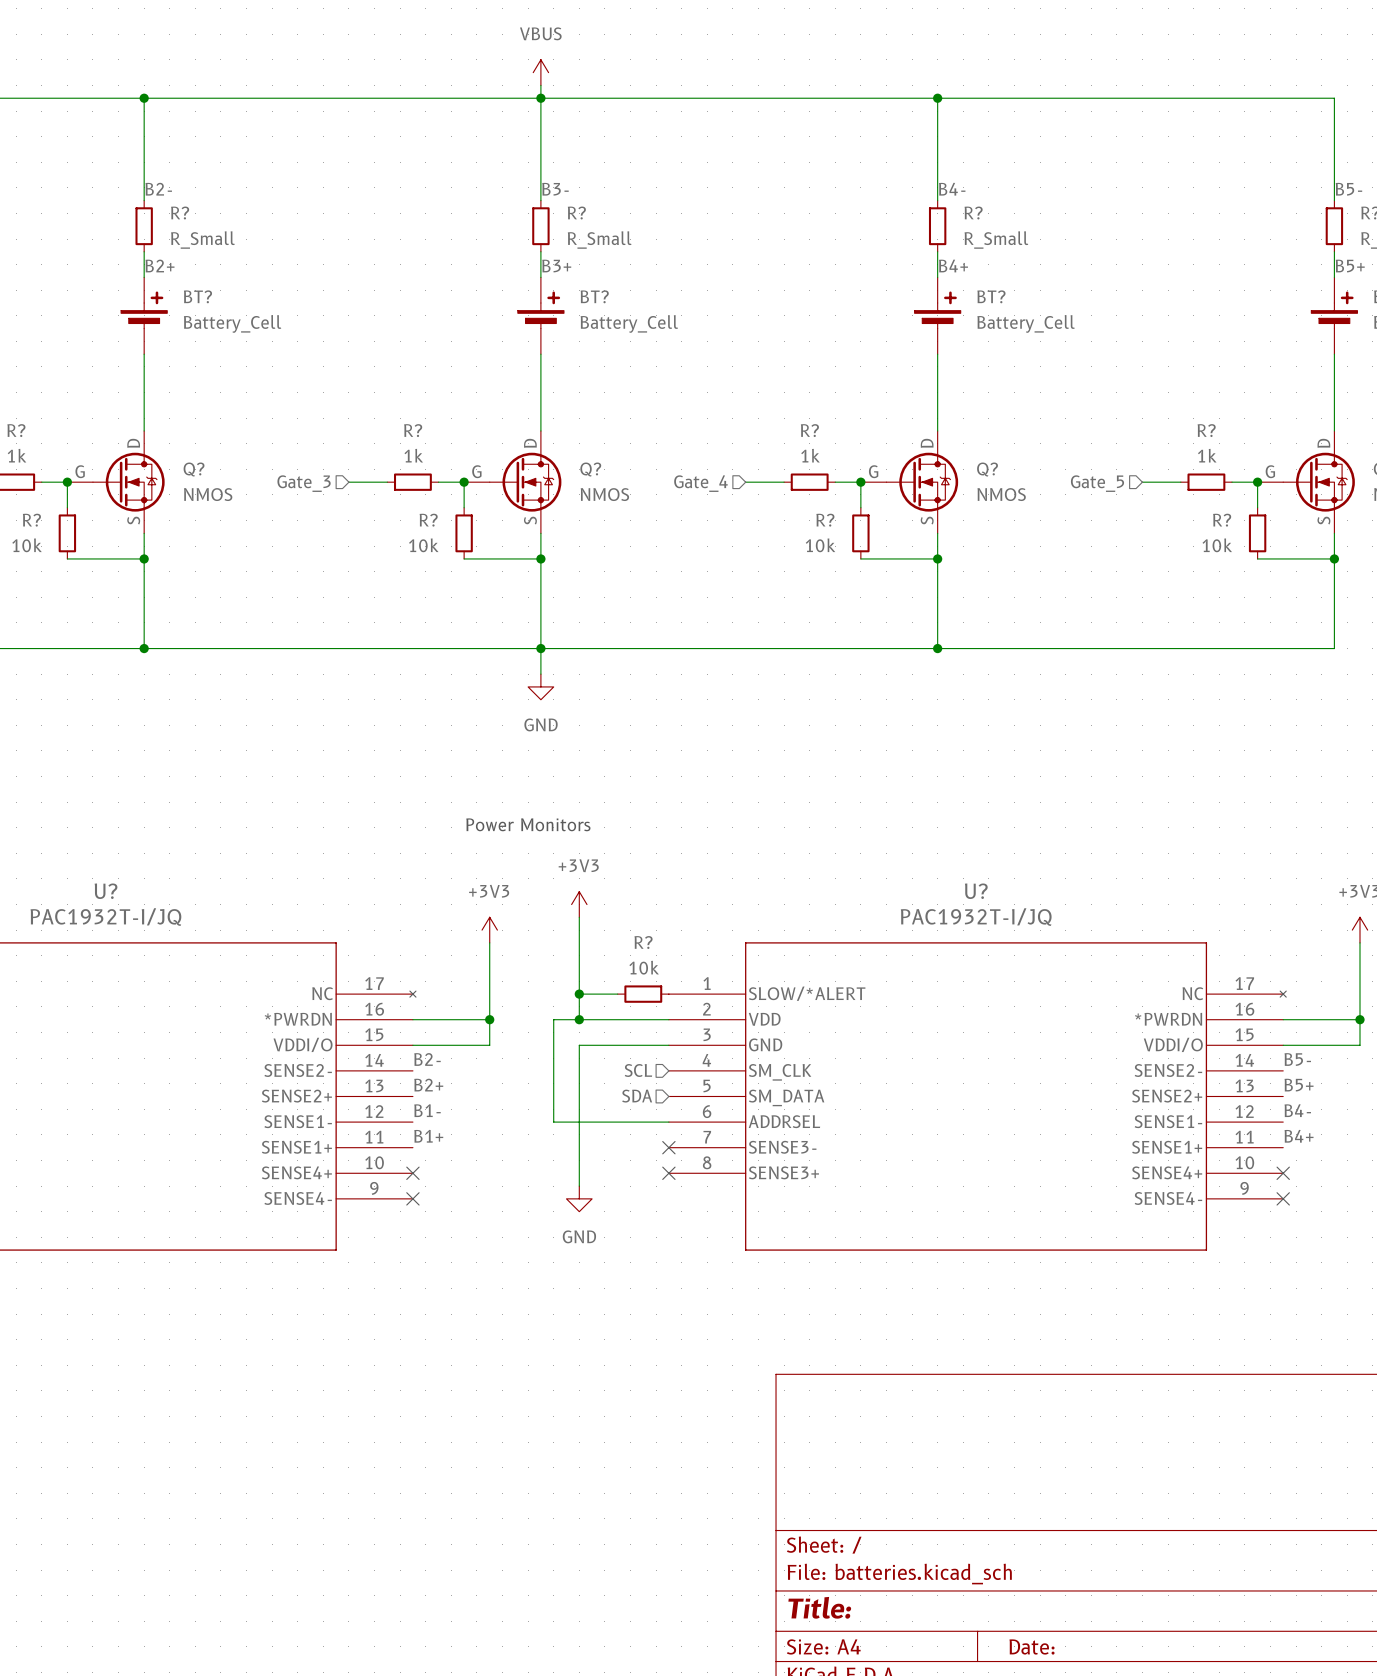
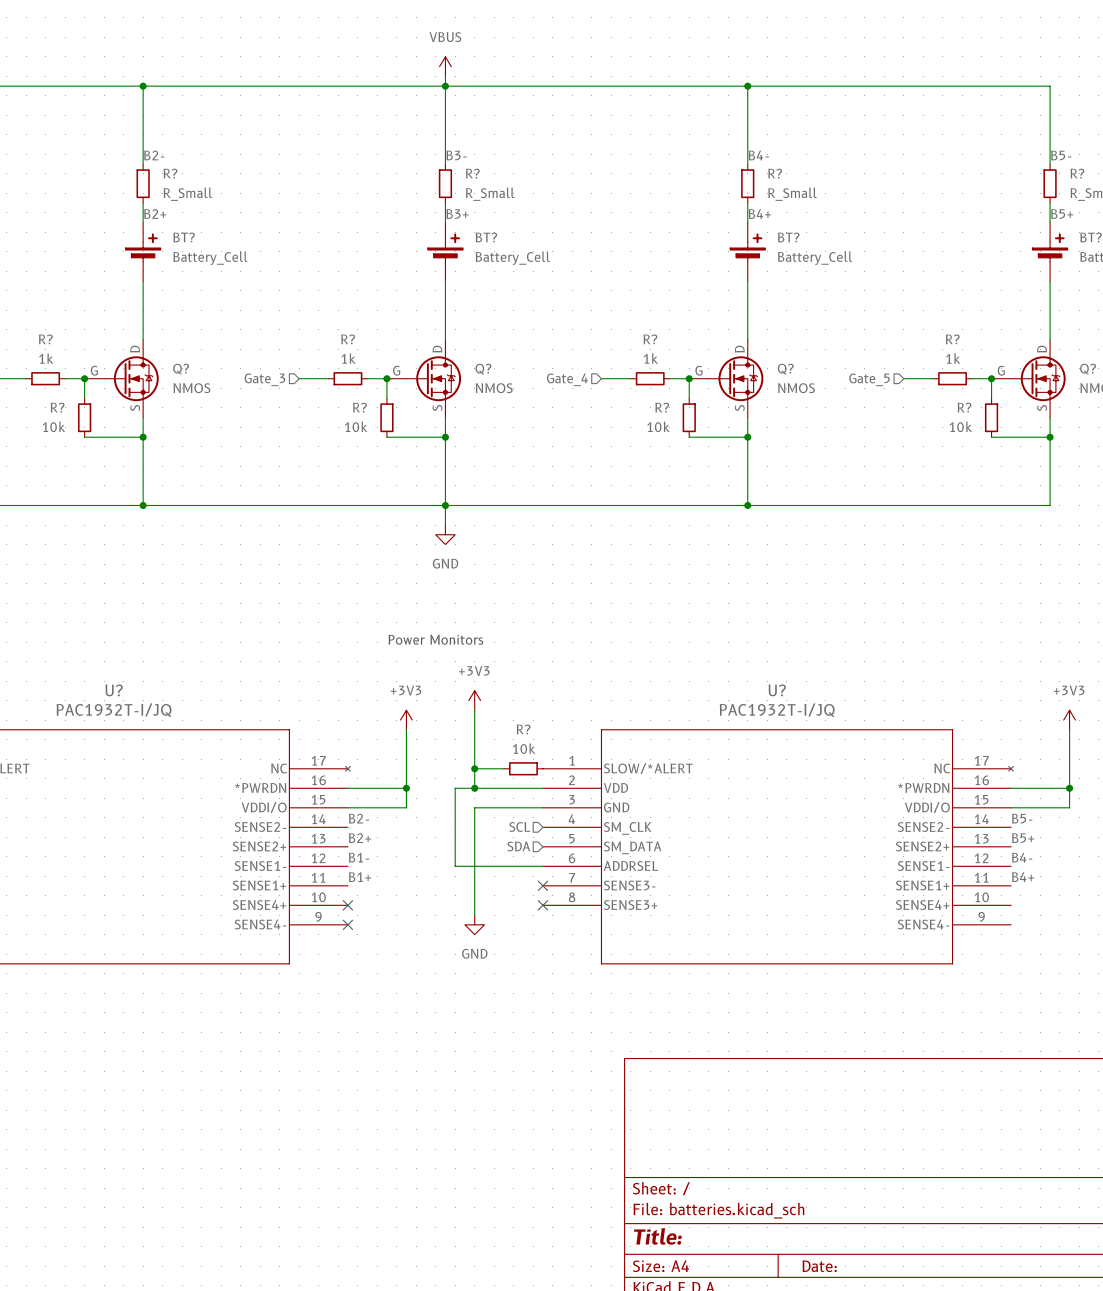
no-connect mark: (1283, 1173) -> none
no-connect mark: (1283, 1198) -> none

